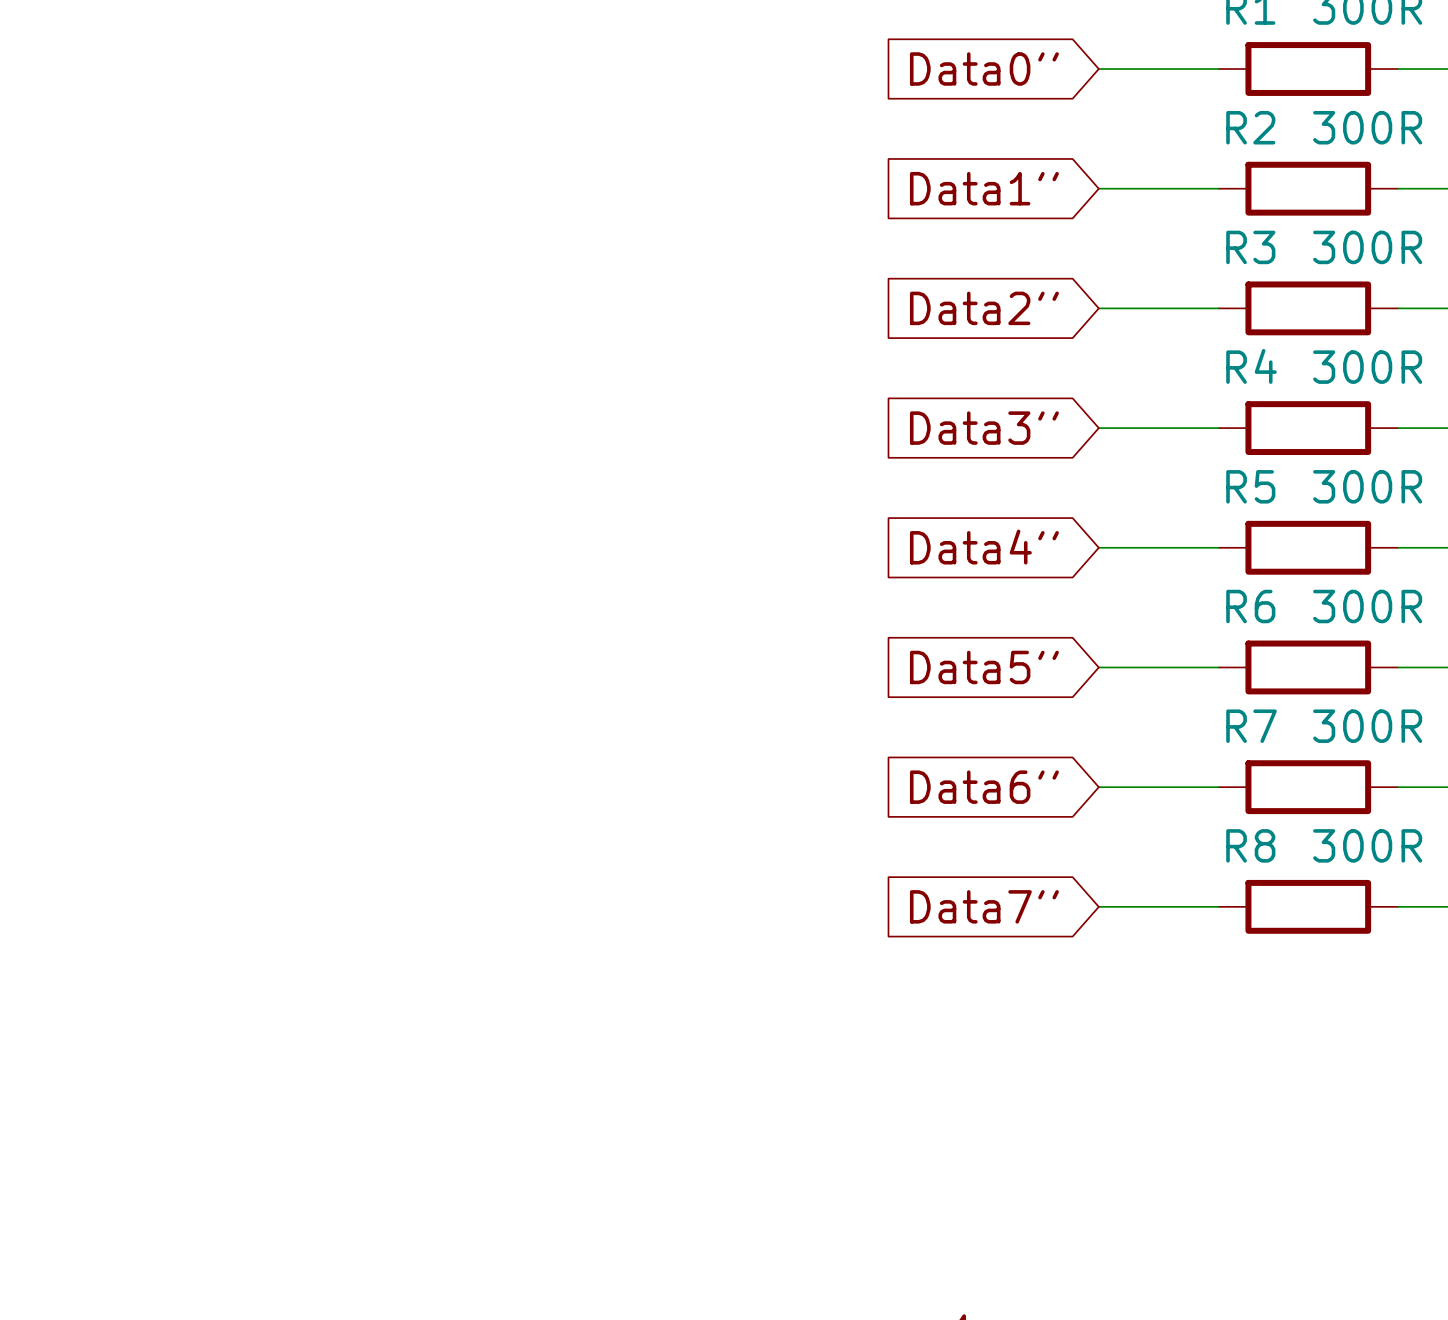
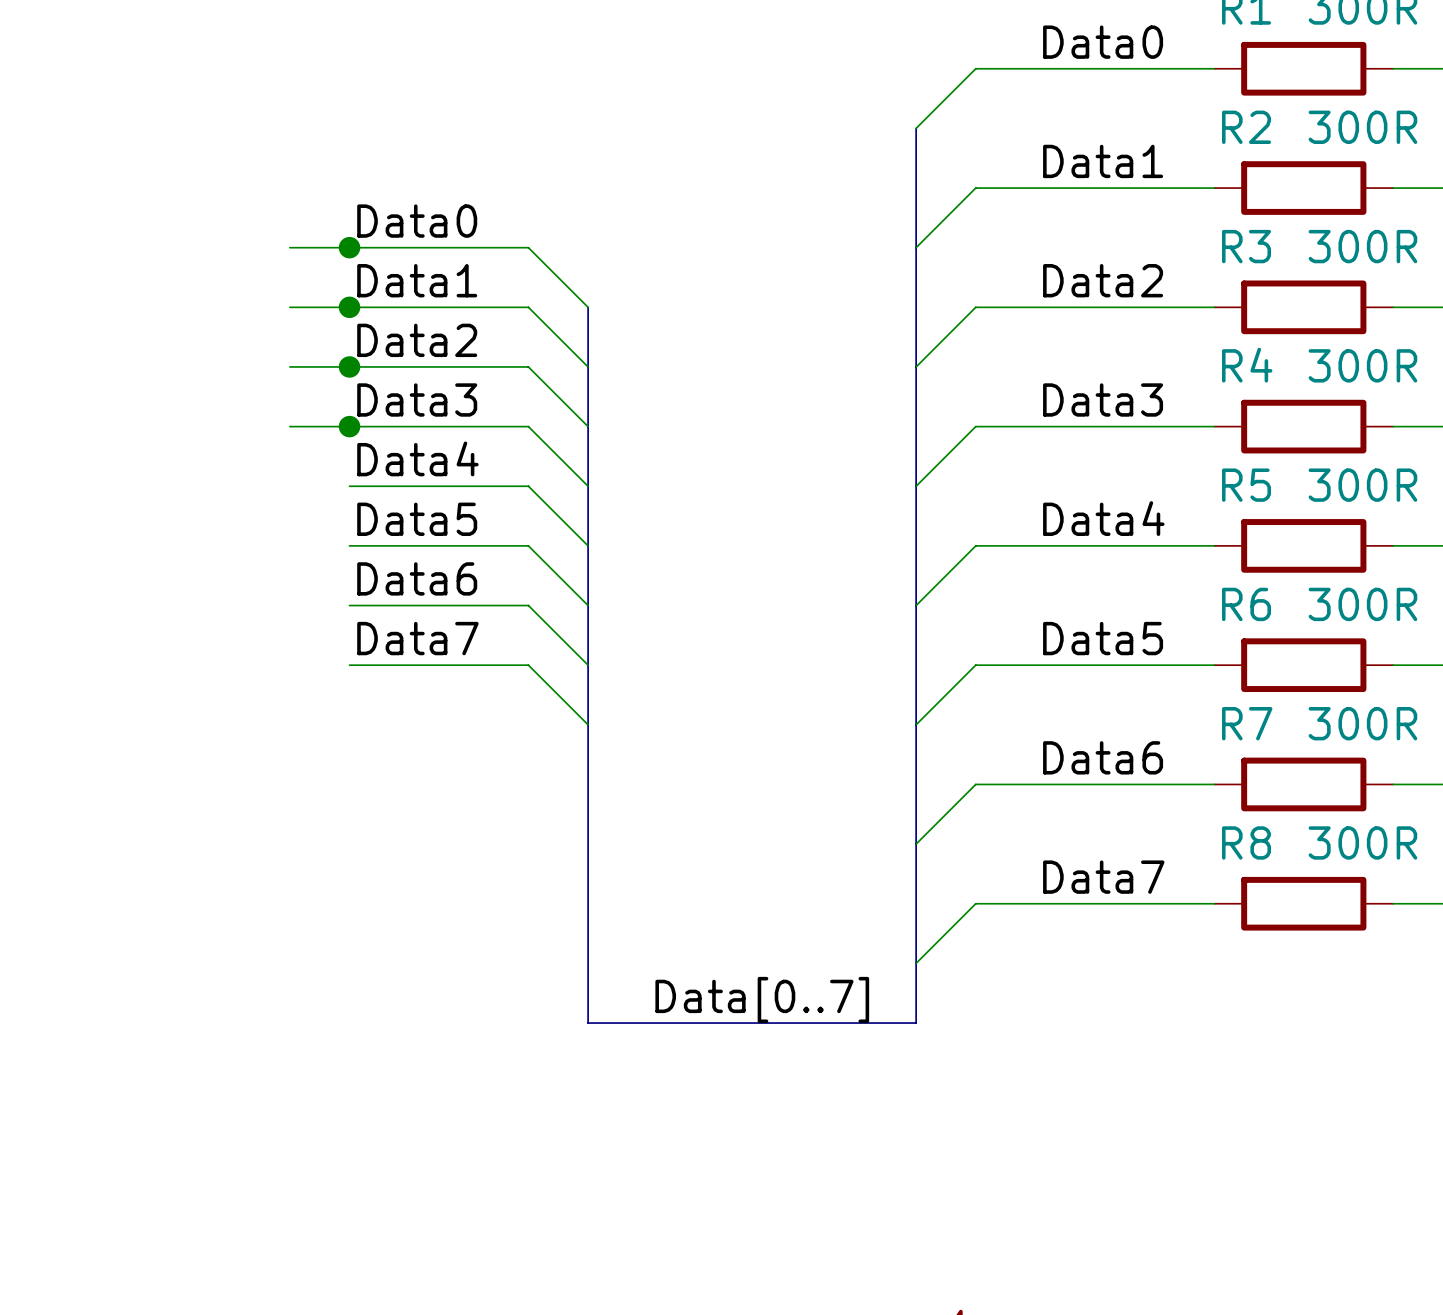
label: none -> Data0 (1103, 42)
global label: Data0'' (984, 69) -> none
wire: none -> (1095, 68) (975, 68) (916, 128)
bus: none -> (916, 128) (916, 1023) (588, 1023) (588, 307)
label: none -> Data1 (1103, 161)
global label: Data1'' (984, 188) -> none
wire: none -> (1095, 188) (975, 188) (916, 247)
label: none -> Data0 (417, 221)
wire: none -> (289, 247) (528, 247) (588, 307)
junction: none -> (349, 247)
label: none -> Data1 (417, 280)
label: none -> Data2 (1103, 280)
wire: none -> (289, 307) (528, 307) (588, 366)
junction: none -> (349, 307)
global label: Data2'' (984, 308) -> none
wire: none -> (1095, 307) (975, 307) (916, 366)
label: none -> Data2 (417, 340)
wire: none -> (289, 366) (528, 366) (588, 426)
junction: none -> (349, 366)
label: none -> Data3 (417, 400)
label: none -> Data3 (1103, 400)
wire: none -> (289, 426) (528, 426) (588, 486)
junction: none -> (349, 426)
global label: Data3'' (984, 428) -> none
wire: none -> (1095, 426) (975, 426) (916, 486)
label: none -> Data4 (417, 458)
wire: none -> (349, 486) (528, 486) (588, 545)
label: none -> Data4 (1103, 518)
label: none -> Data5 (417, 519)
wire: none -> (349, 545) (528, 545) (588, 605)
global label: Data4'' (984, 547) -> none
wire: none -> (1095, 545) (975, 545) (916, 605)
label: none -> Data6 (417, 578)
wire: none -> (349, 605) (528, 605) (588, 665)
label: none -> Data7 (417, 638)
label: none -> Data5 (1103, 638)
wire: none -> (349, 665) (528, 665) (588, 724)
global label: Data5'' (984, 667) -> none
wire: none -> (1095, 665) (975, 665) (916, 724)
label: none -> Data6 (1103, 757)
global label: Data6'' (984, 787) -> none
wire: none -> (1095, 784) (975, 784) (916, 844)
label: none -> Data7 (1103, 877)
global label: Data7'' (984, 906) -> none
wire: none -> (1095, 903) (975, 903) (916, 963)
label: none -> Data[0..7] (762, 999)

